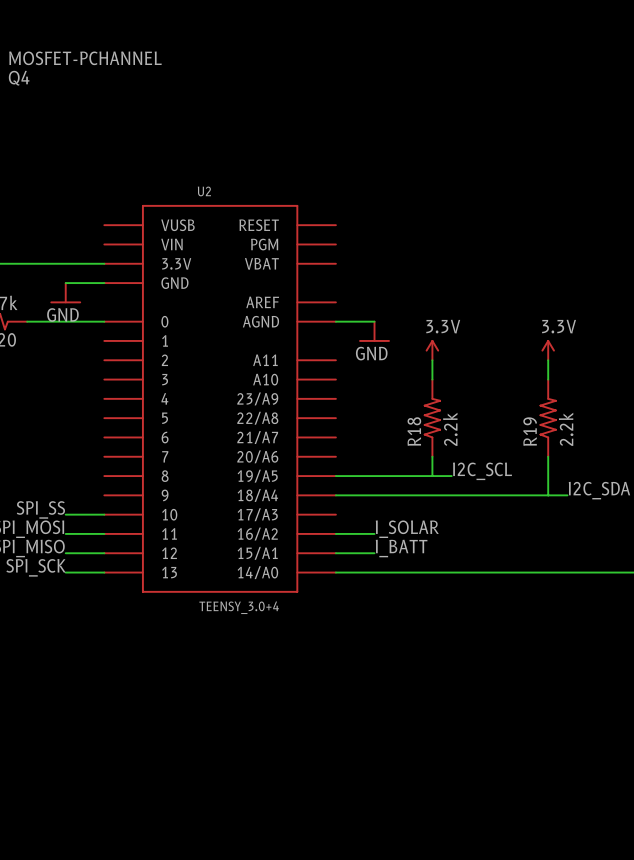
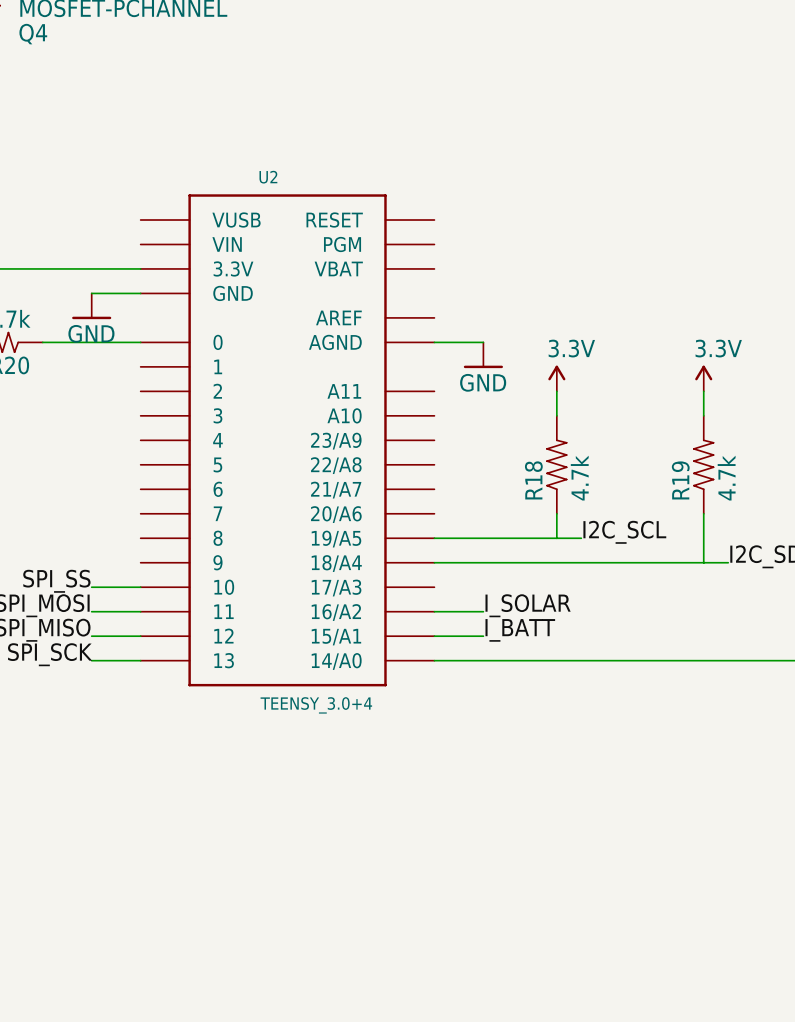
R18 value: 2.2k (450, 429) -> 4.7k (579, 478)
R19 value: 2.2k (566, 429) -> 4.7k (726, 478)

